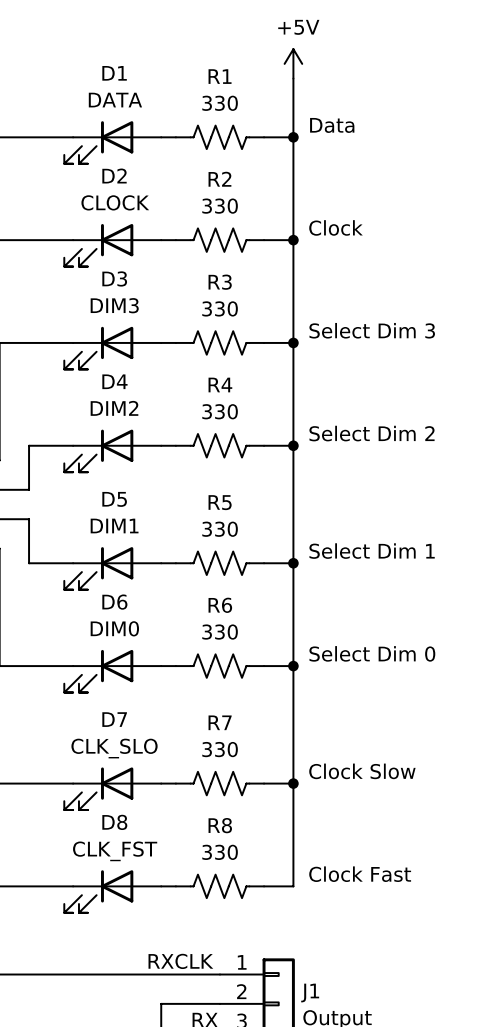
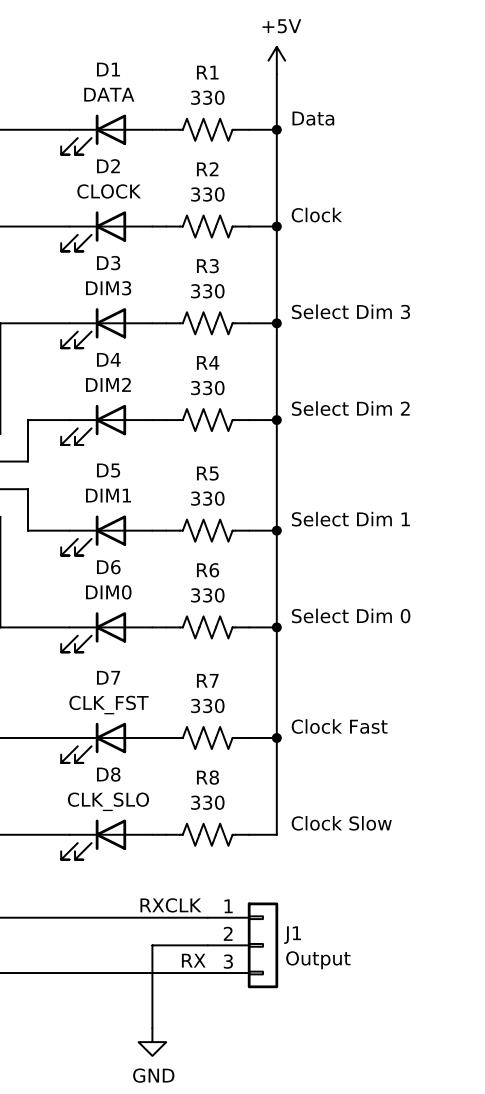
D7 value: CLK_SLO (114, 748) -> CLK_FST (109, 705)
text: Clock Slow (362, 771) -> Clock Fast (339, 726)
D8 value: CLK_FST (115, 851) -> CLK_SLO (108, 801)
text: Clock Fast (360, 874) -> Clock Slow (341, 823)

